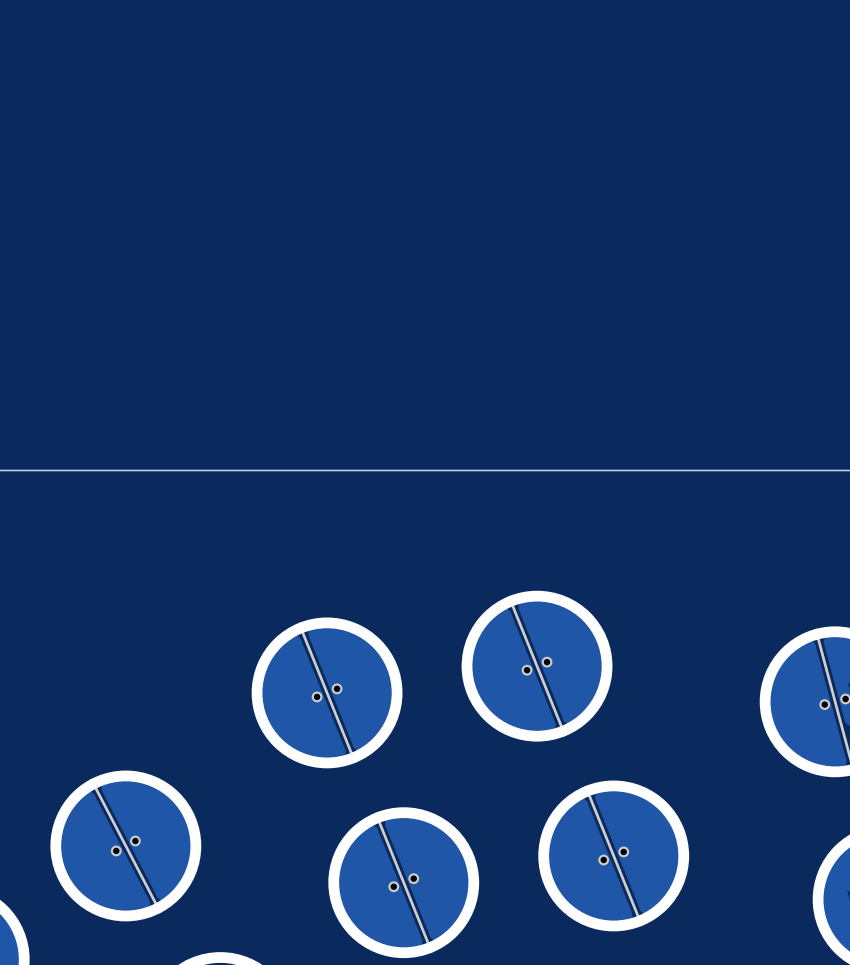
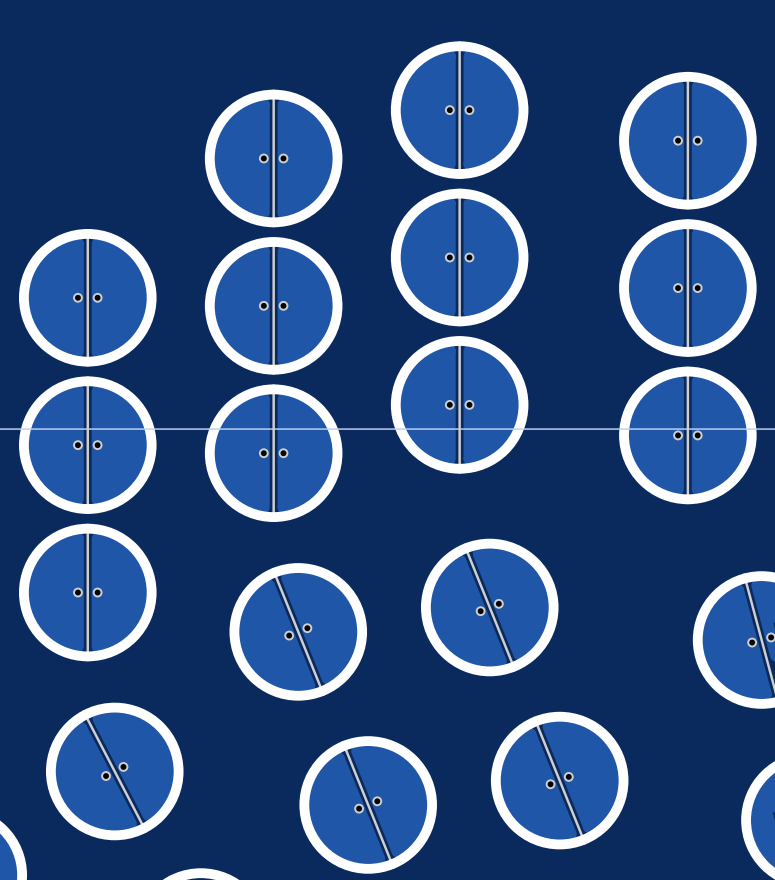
part: none -> (459, 110)
part: none -> (687, 140)
part: none -> (273, 158)
part: none -> (459, 257)
part: none -> (687, 288)
part: none -> (87, 297)
part: none -> (273, 305)
part: none -> (459, 404)
part: none -> (687, 435)
part: none -> (87, 445)
part: none -> (273, 453)
part: none -> (87, 592)

